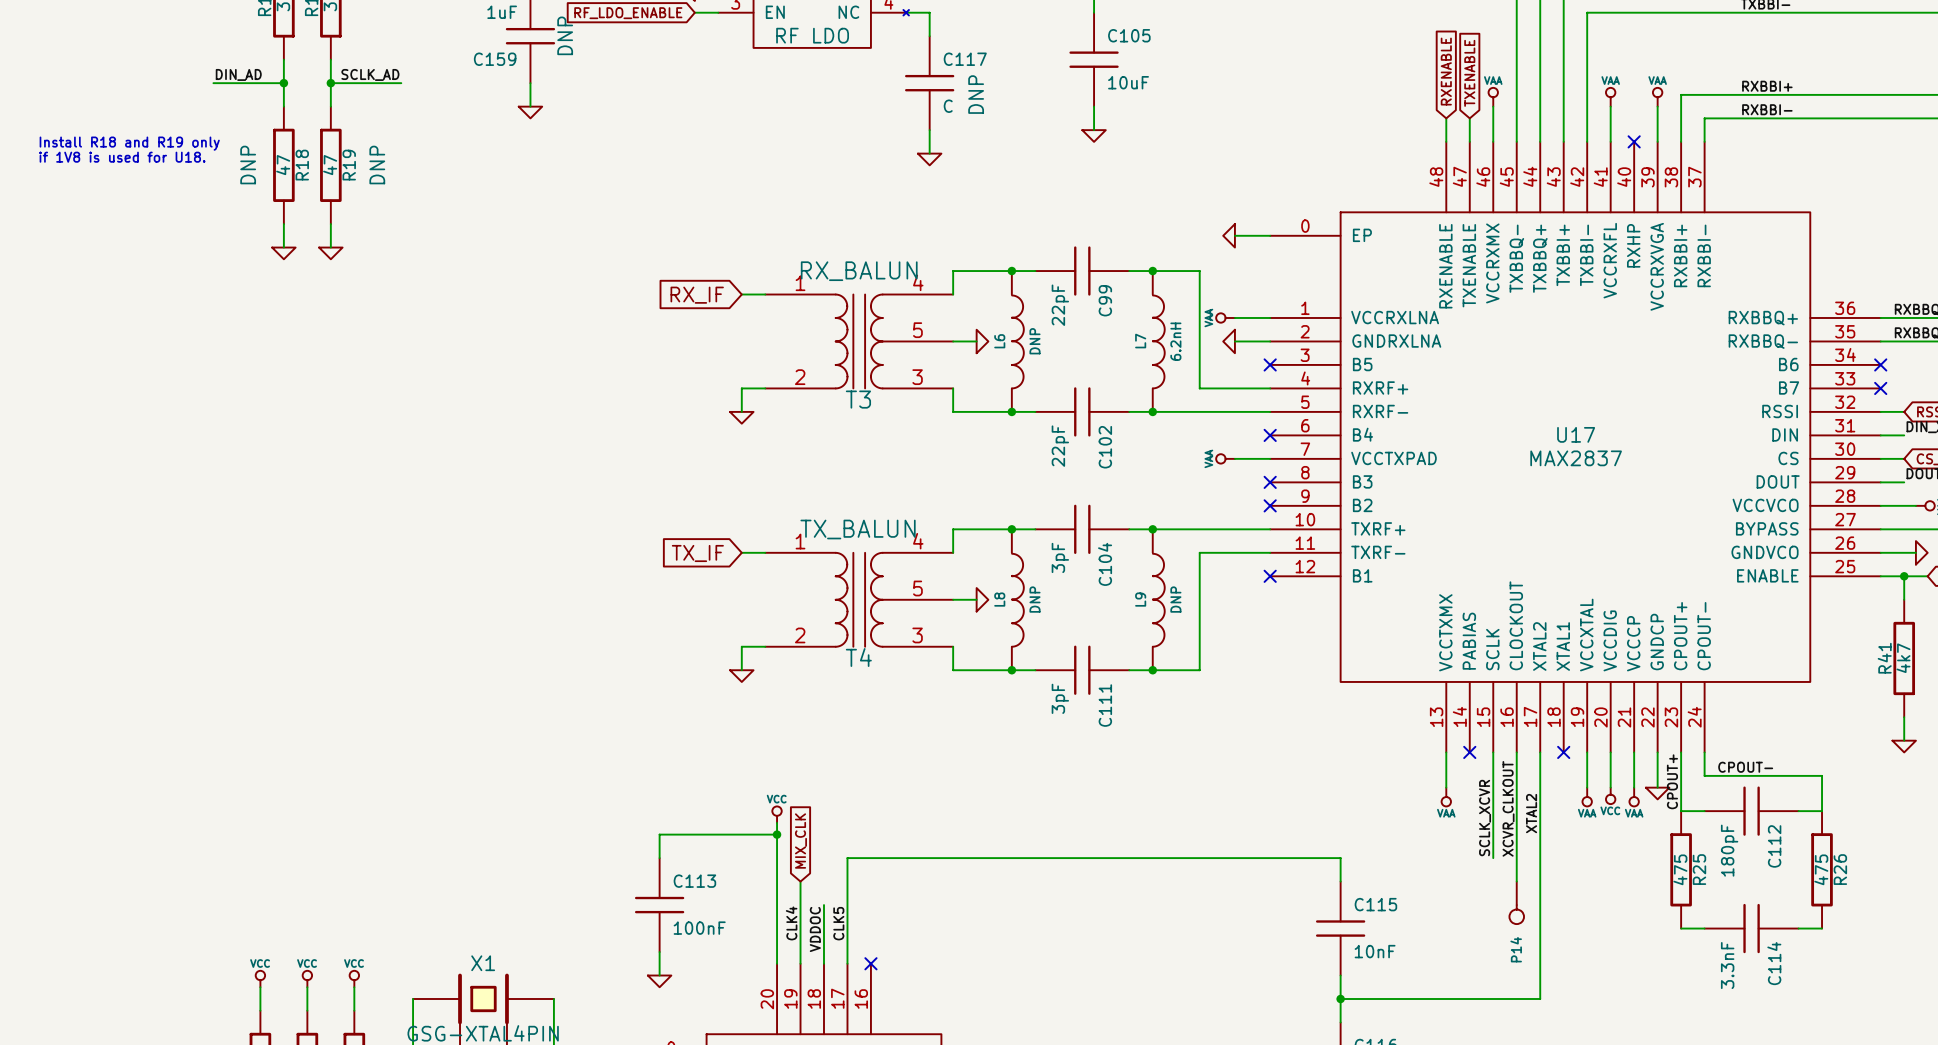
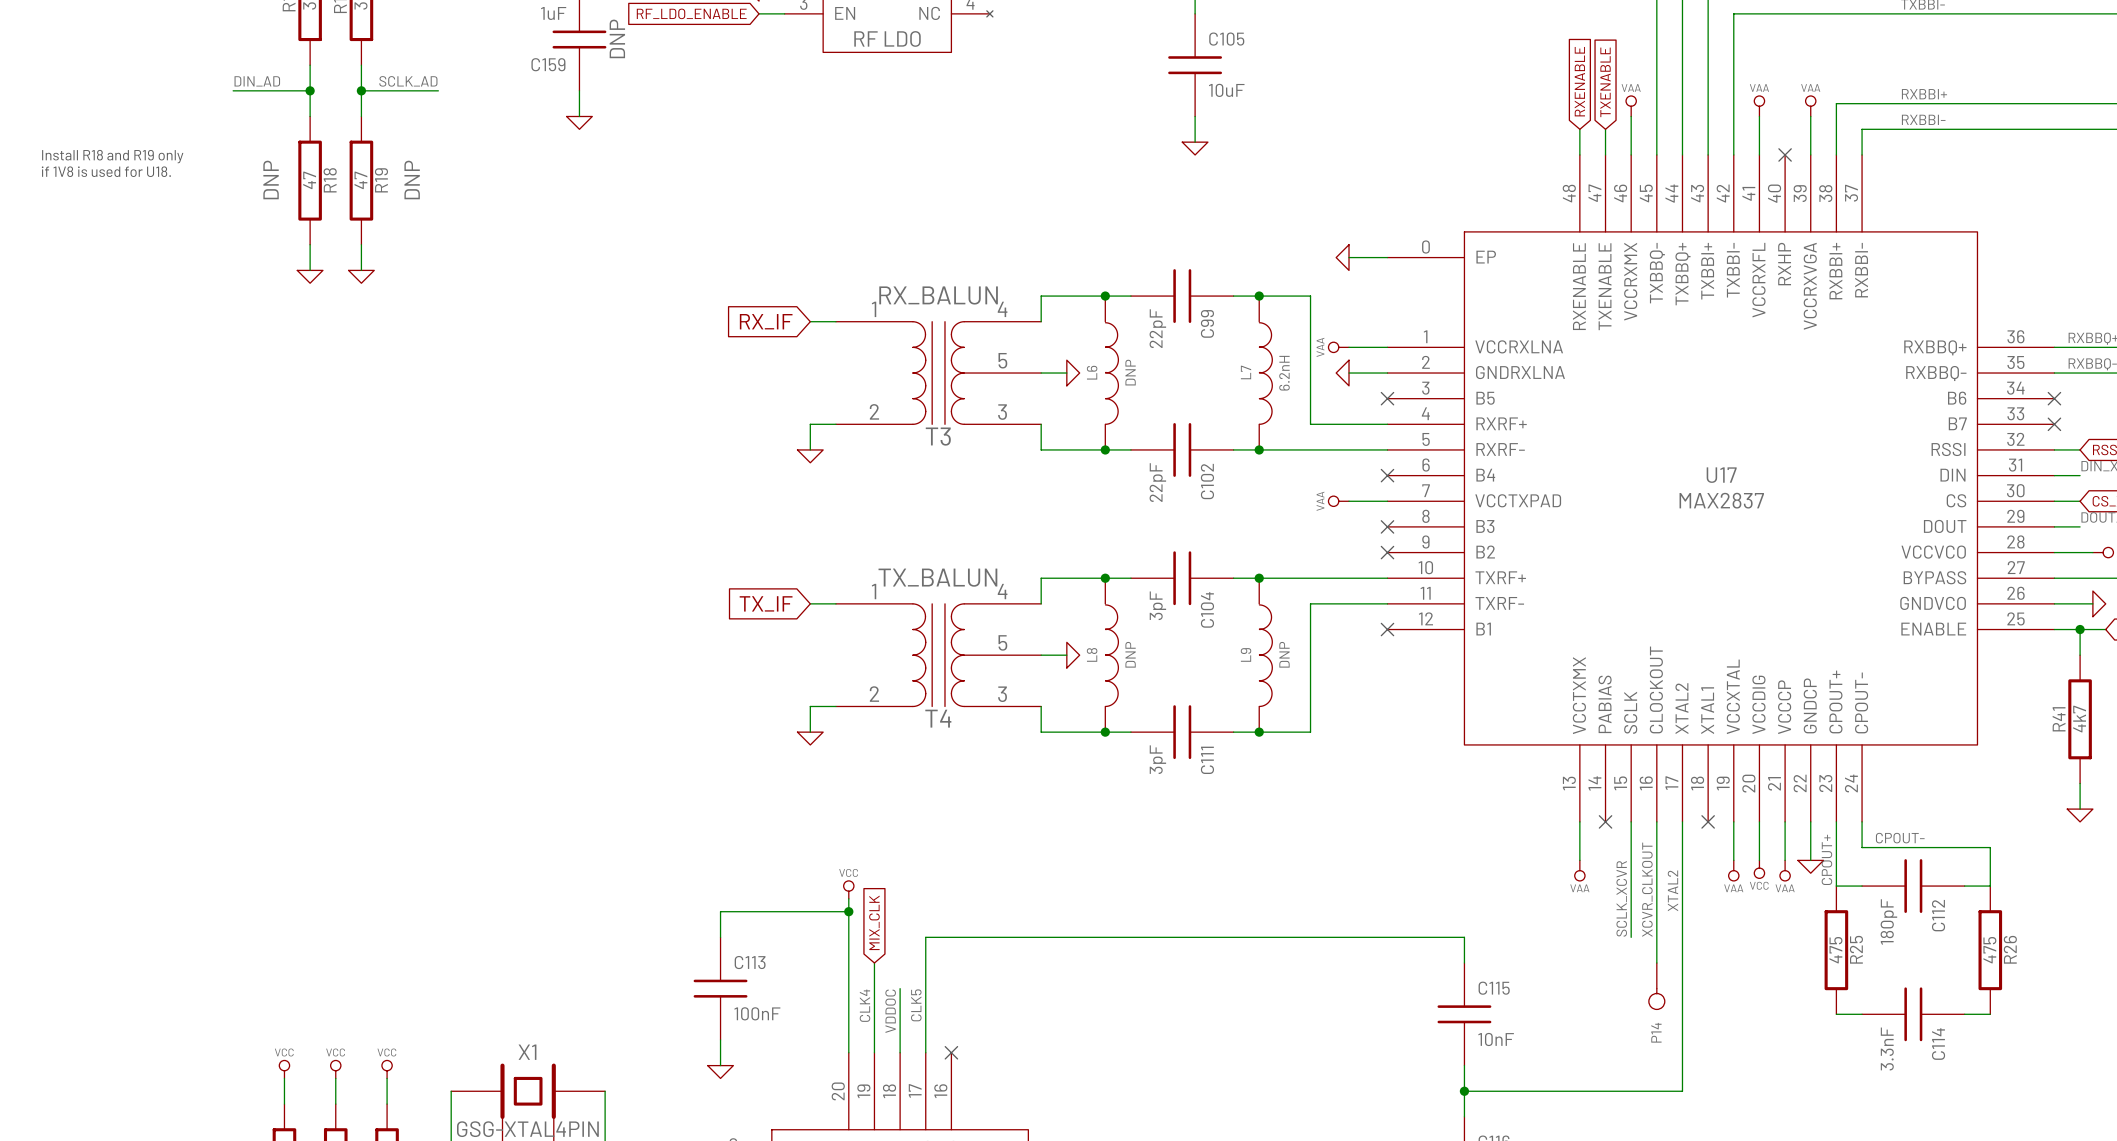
wire: (906, 12) (929, 12) (929, 36) -> none
C117: C (929, 83) -> none
wire: (929, 130) (929, 153) -> none
power symbol: (929, 159) -> none

